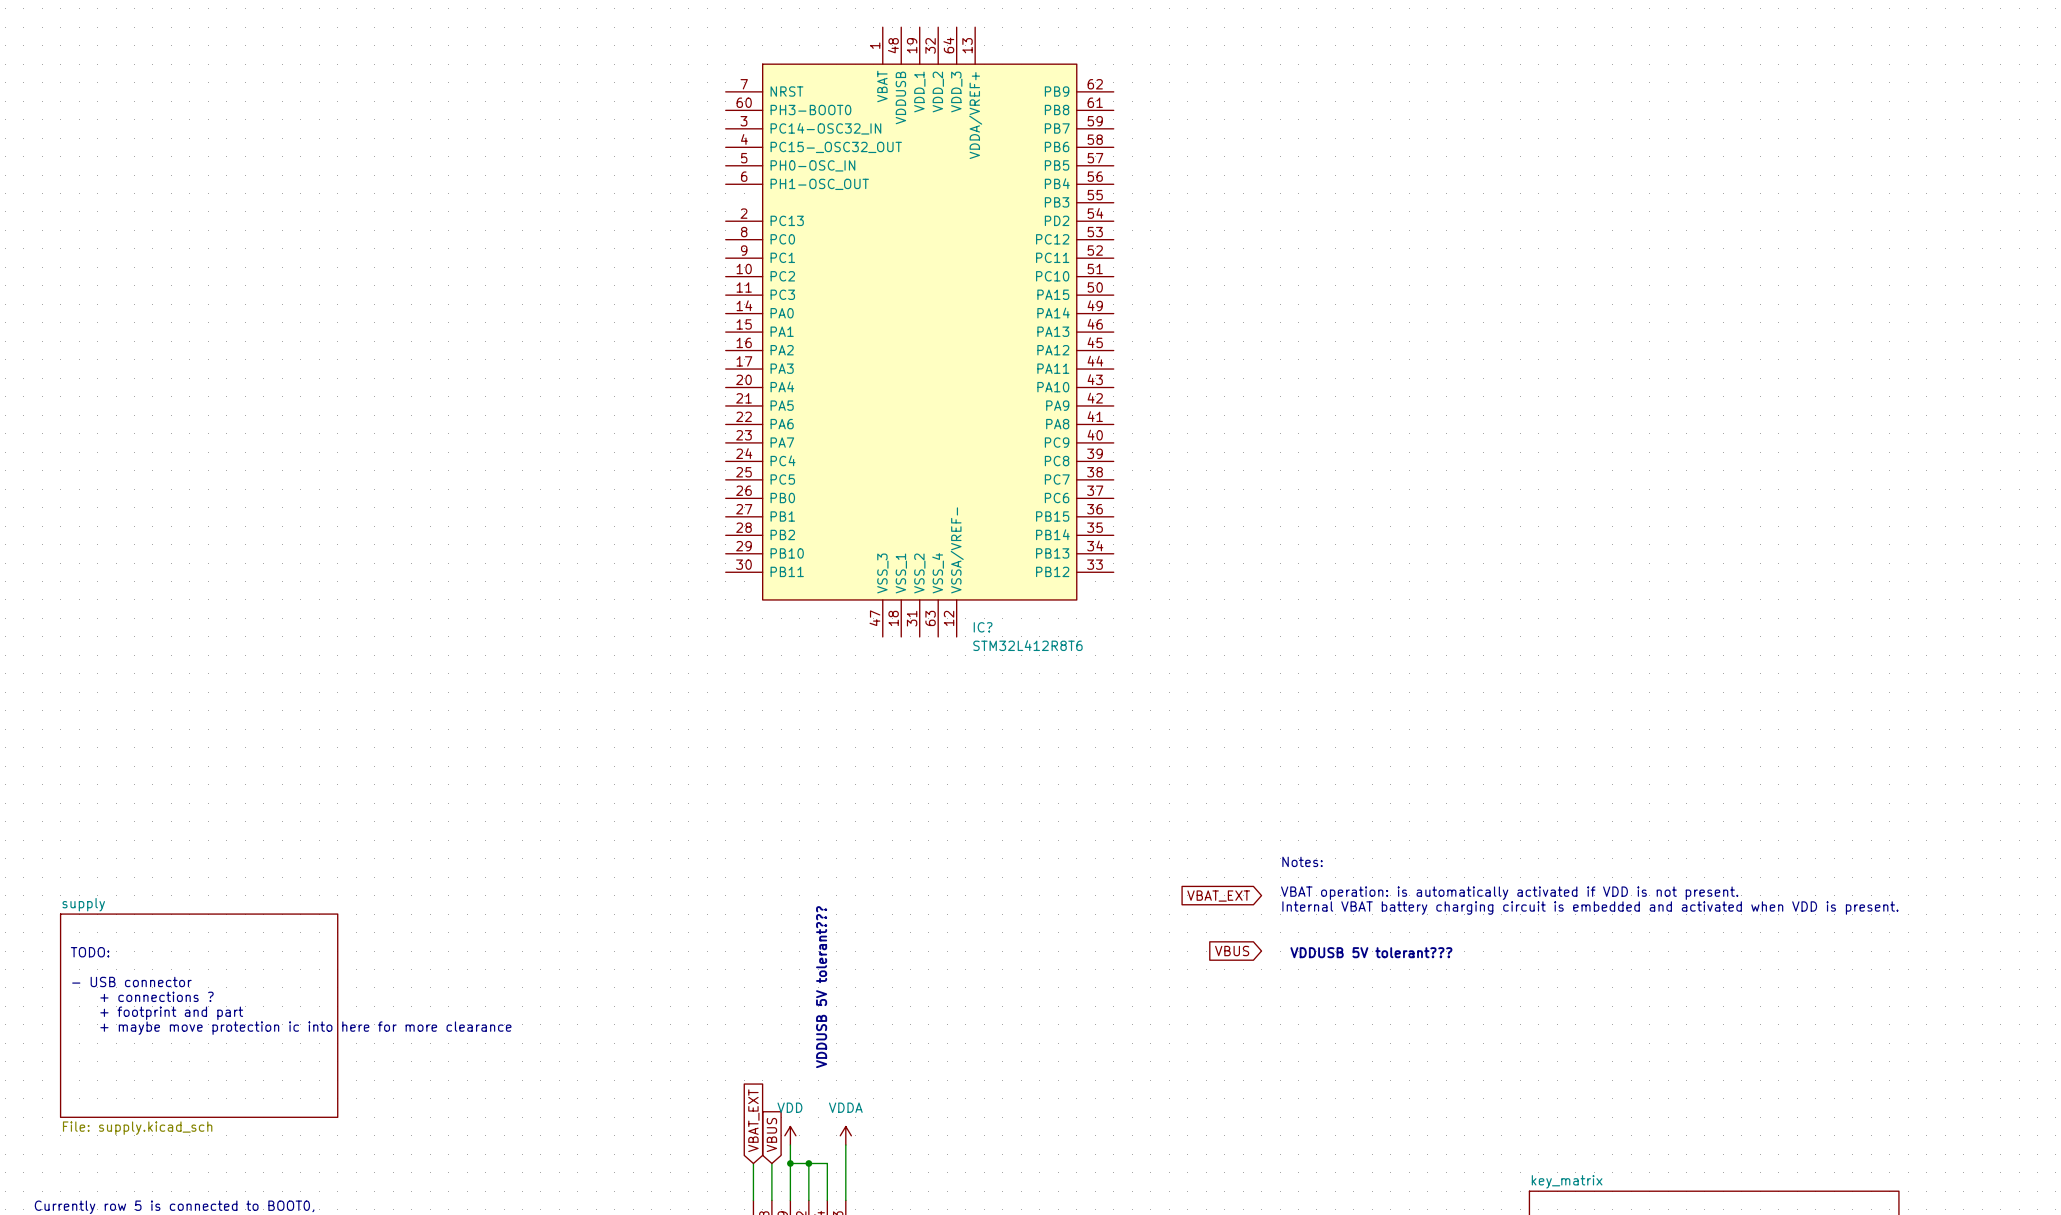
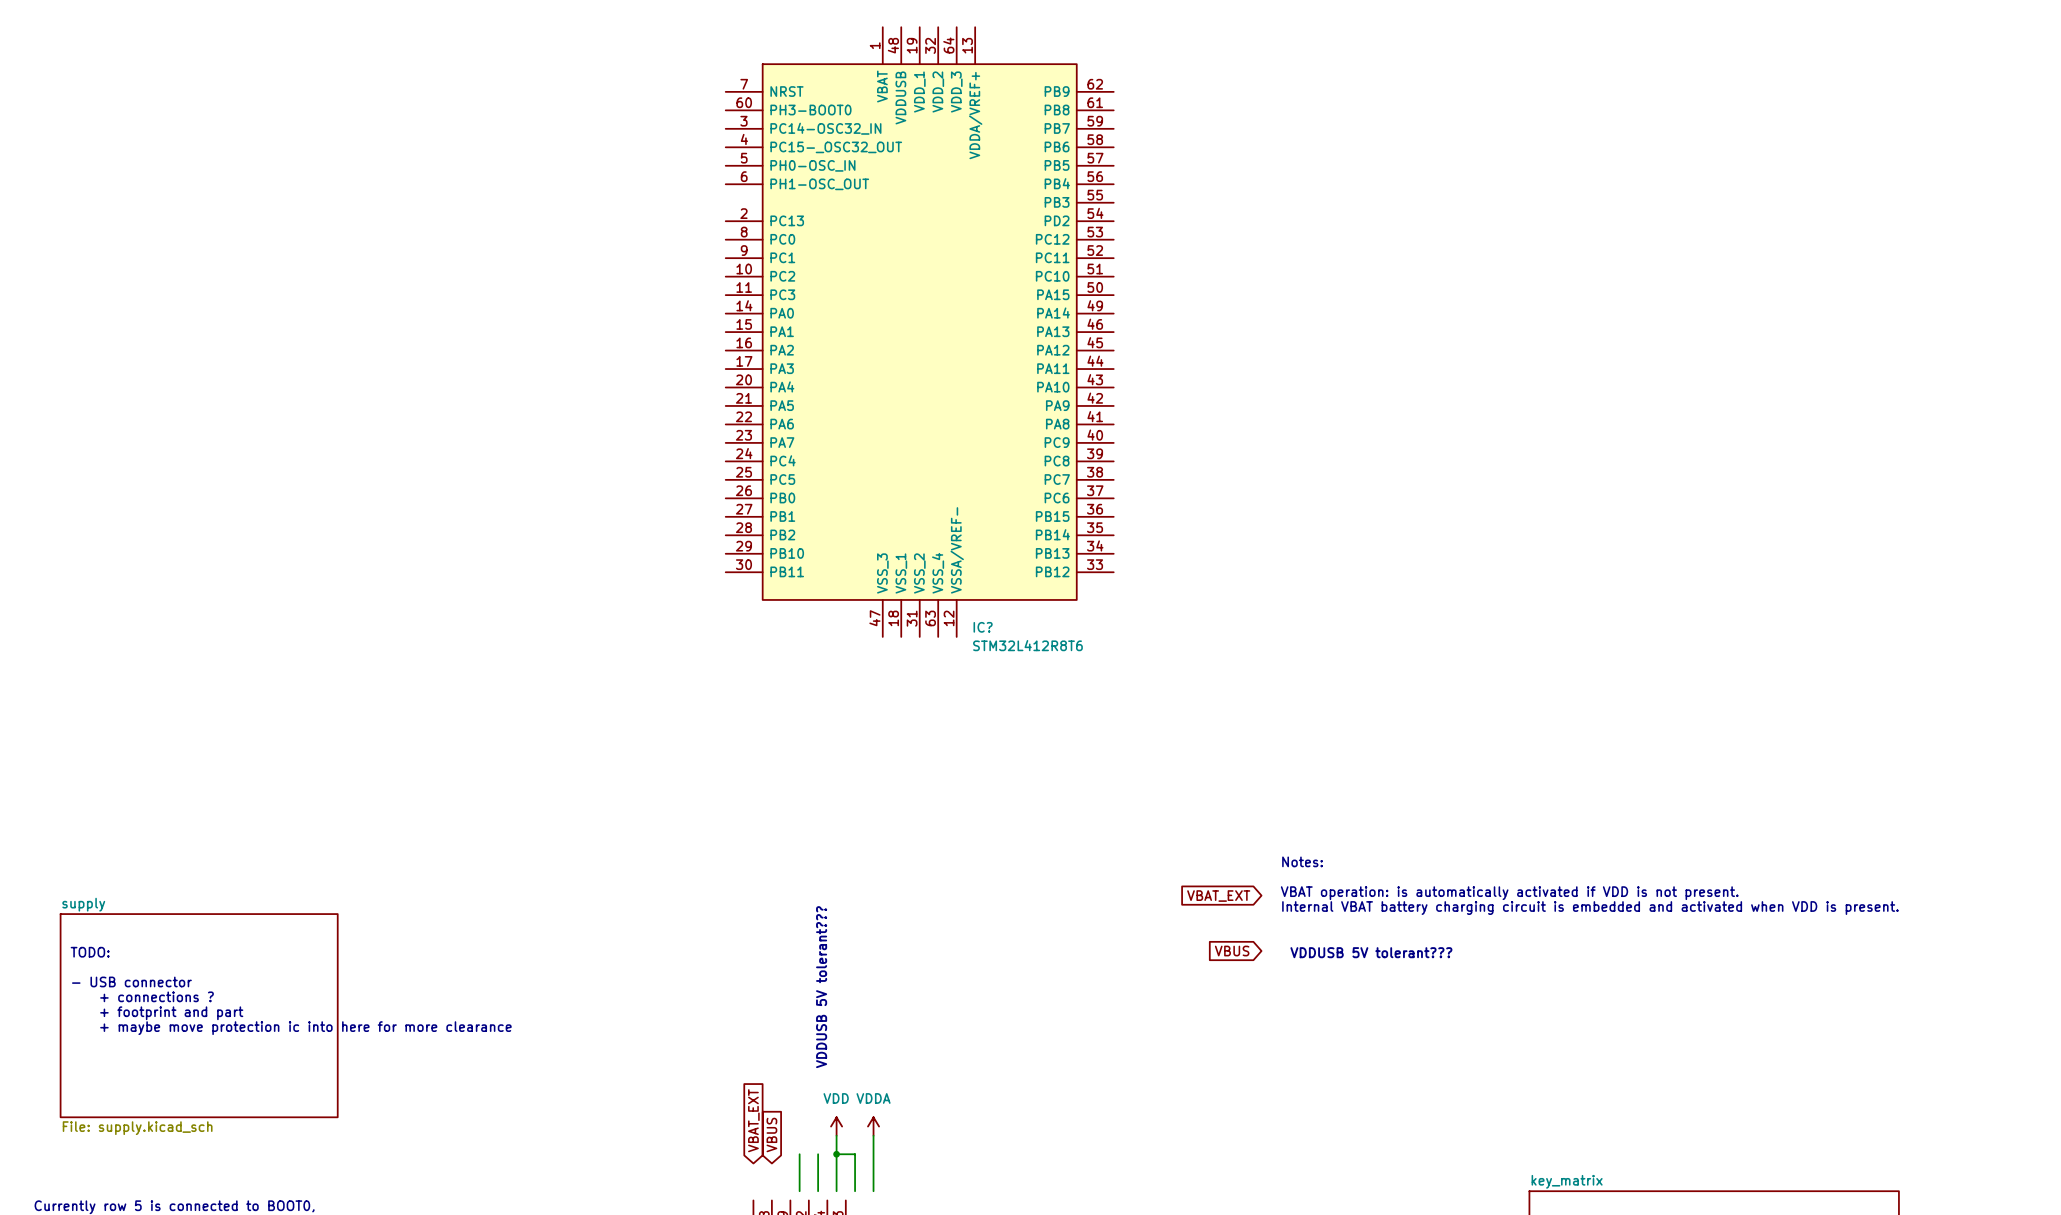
power symbol position: VDD (790, 1135) -> VDD (836, 1126)
power symbol position: VDDA (845, 1135) -> VDDA (873, 1126)
wire: (790, 1145) (790, 1200) -> (836, 1135) (836, 1191)
wire: (845, 1145) (845, 1200) -> (873, 1135) (873, 1191)
wire: none -> (836, 1154) (855, 1154) (855, 1191)
junction: none -> (836, 1154)
wire: (753, 1163) (753, 1200) -> (799, 1154) (799, 1191)
wire: (771, 1163) (771, 1200) -> (818, 1154) (818, 1191)
wire: (790, 1163) (827, 1163) (827, 1200) -> none
junction: (790, 1163) -> none
wire: (808, 1163) (808, 1200) -> none
junction: (808, 1163) -> none

